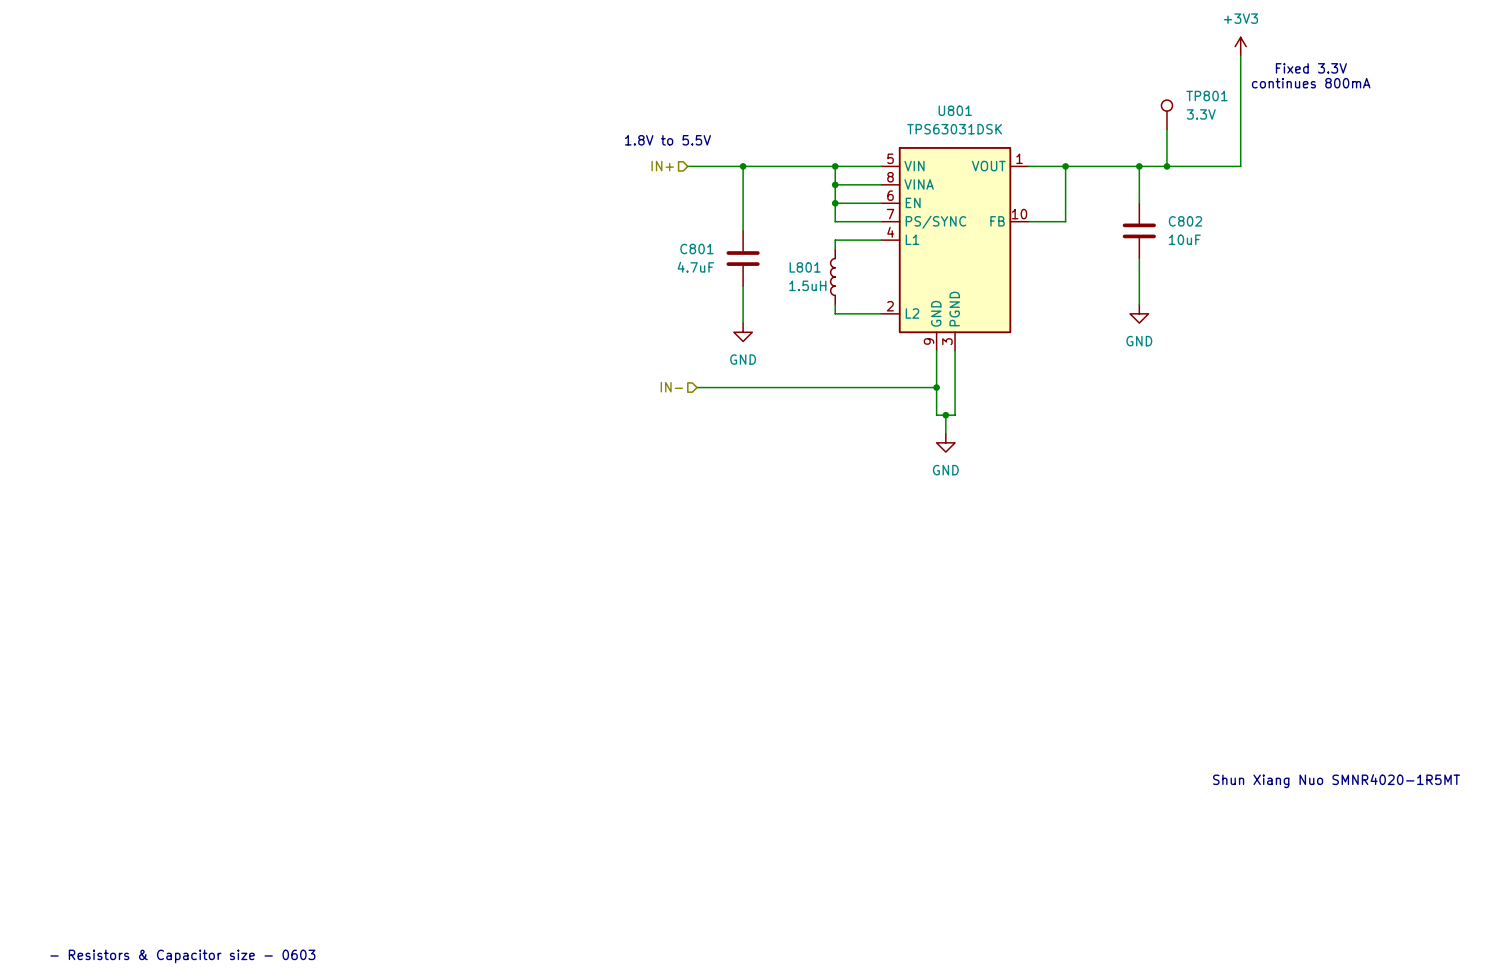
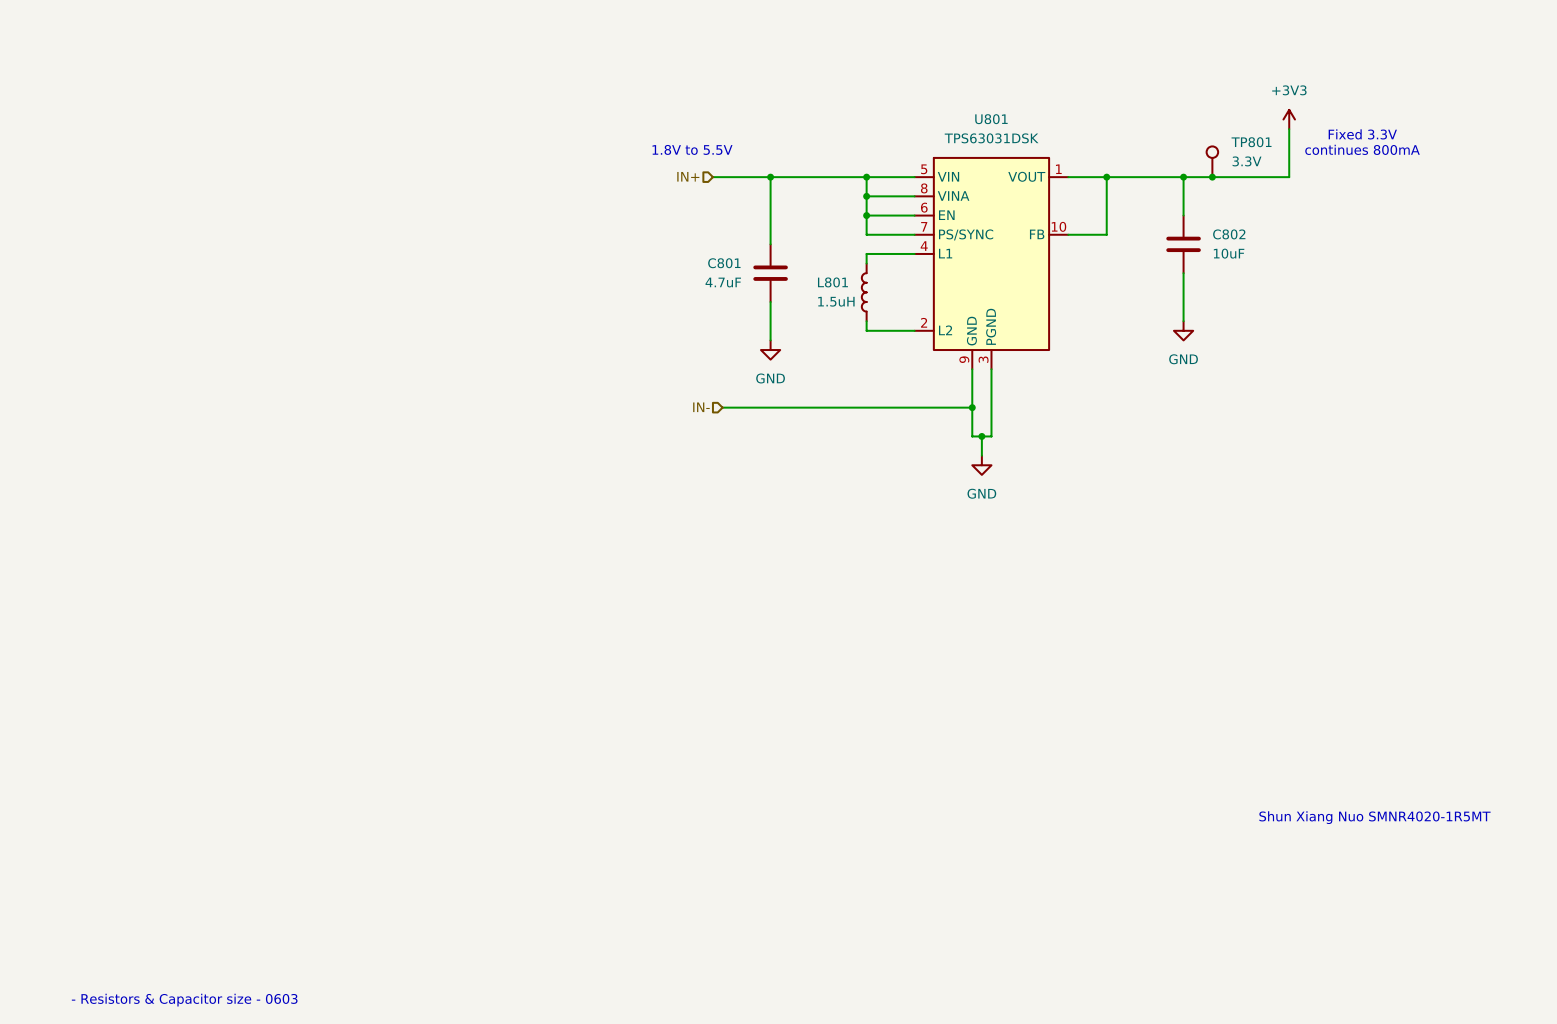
power symbol position: +3V3 (1240, 46) -> +3V3 (1289, 119)
wire: (1240, 55) (1240, 120) -> none
text position: Fixed 3.3V (1311, 68) -> Fixed 3.3V (1362, 134)
text position: continues 800mA (1311, 83) -> continues 800mA (1362, 149)
TP801 position: (1166, 114) -> (1212, 161)

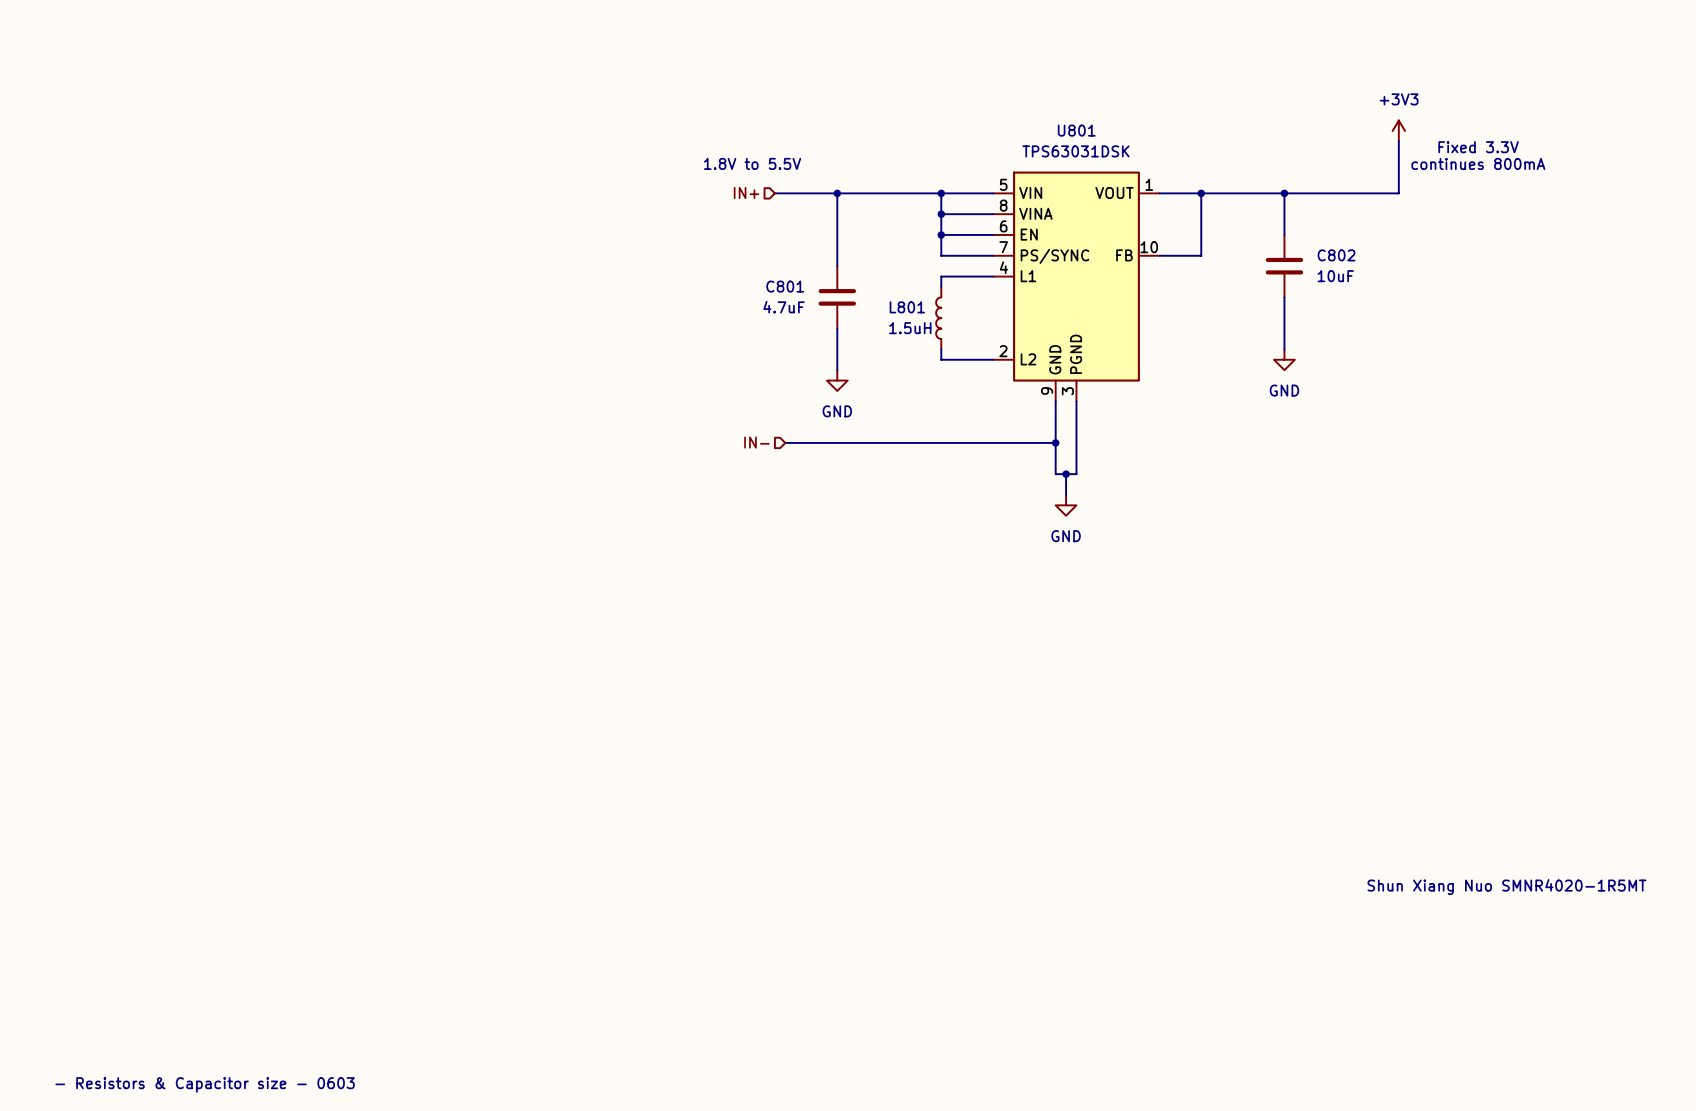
TP801: 3.3V (1212, 161) -> none
junction: (1212, 177) -> none

